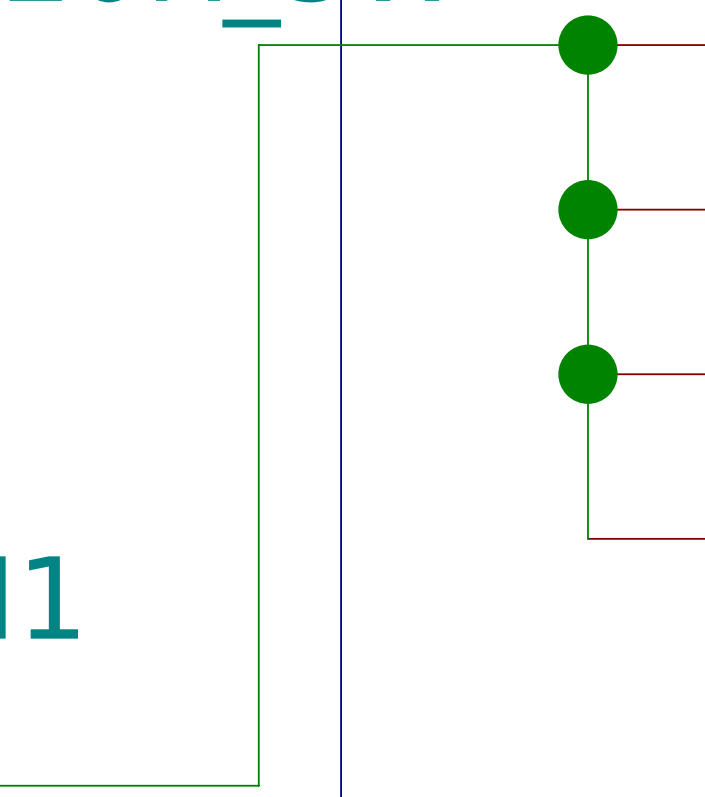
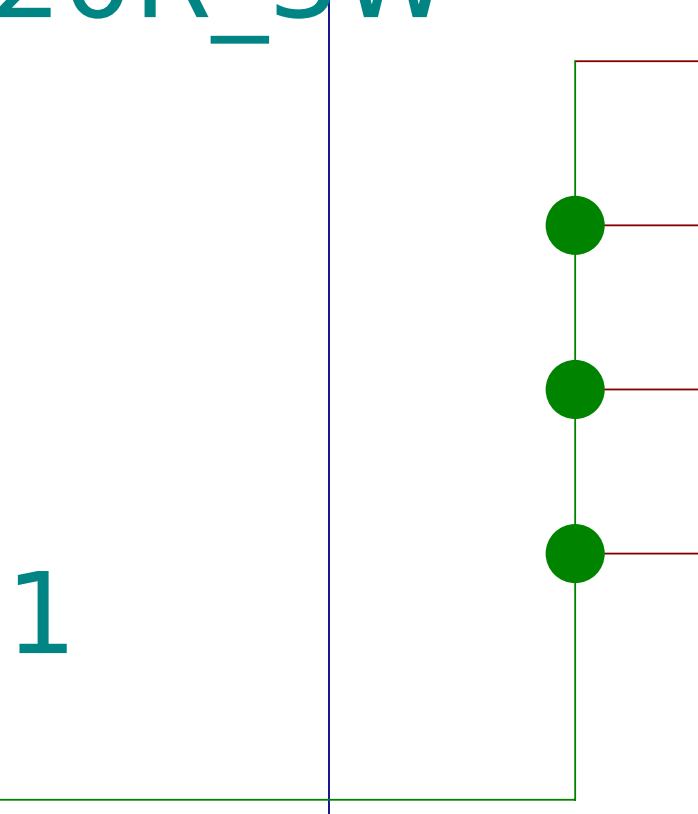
wire: (587, 45) (258, 45) (258, 785) -> (575, 553) (575, 799) (246, 799)
junction: (587, 45) -> none
junction: none -> (575, 553)

